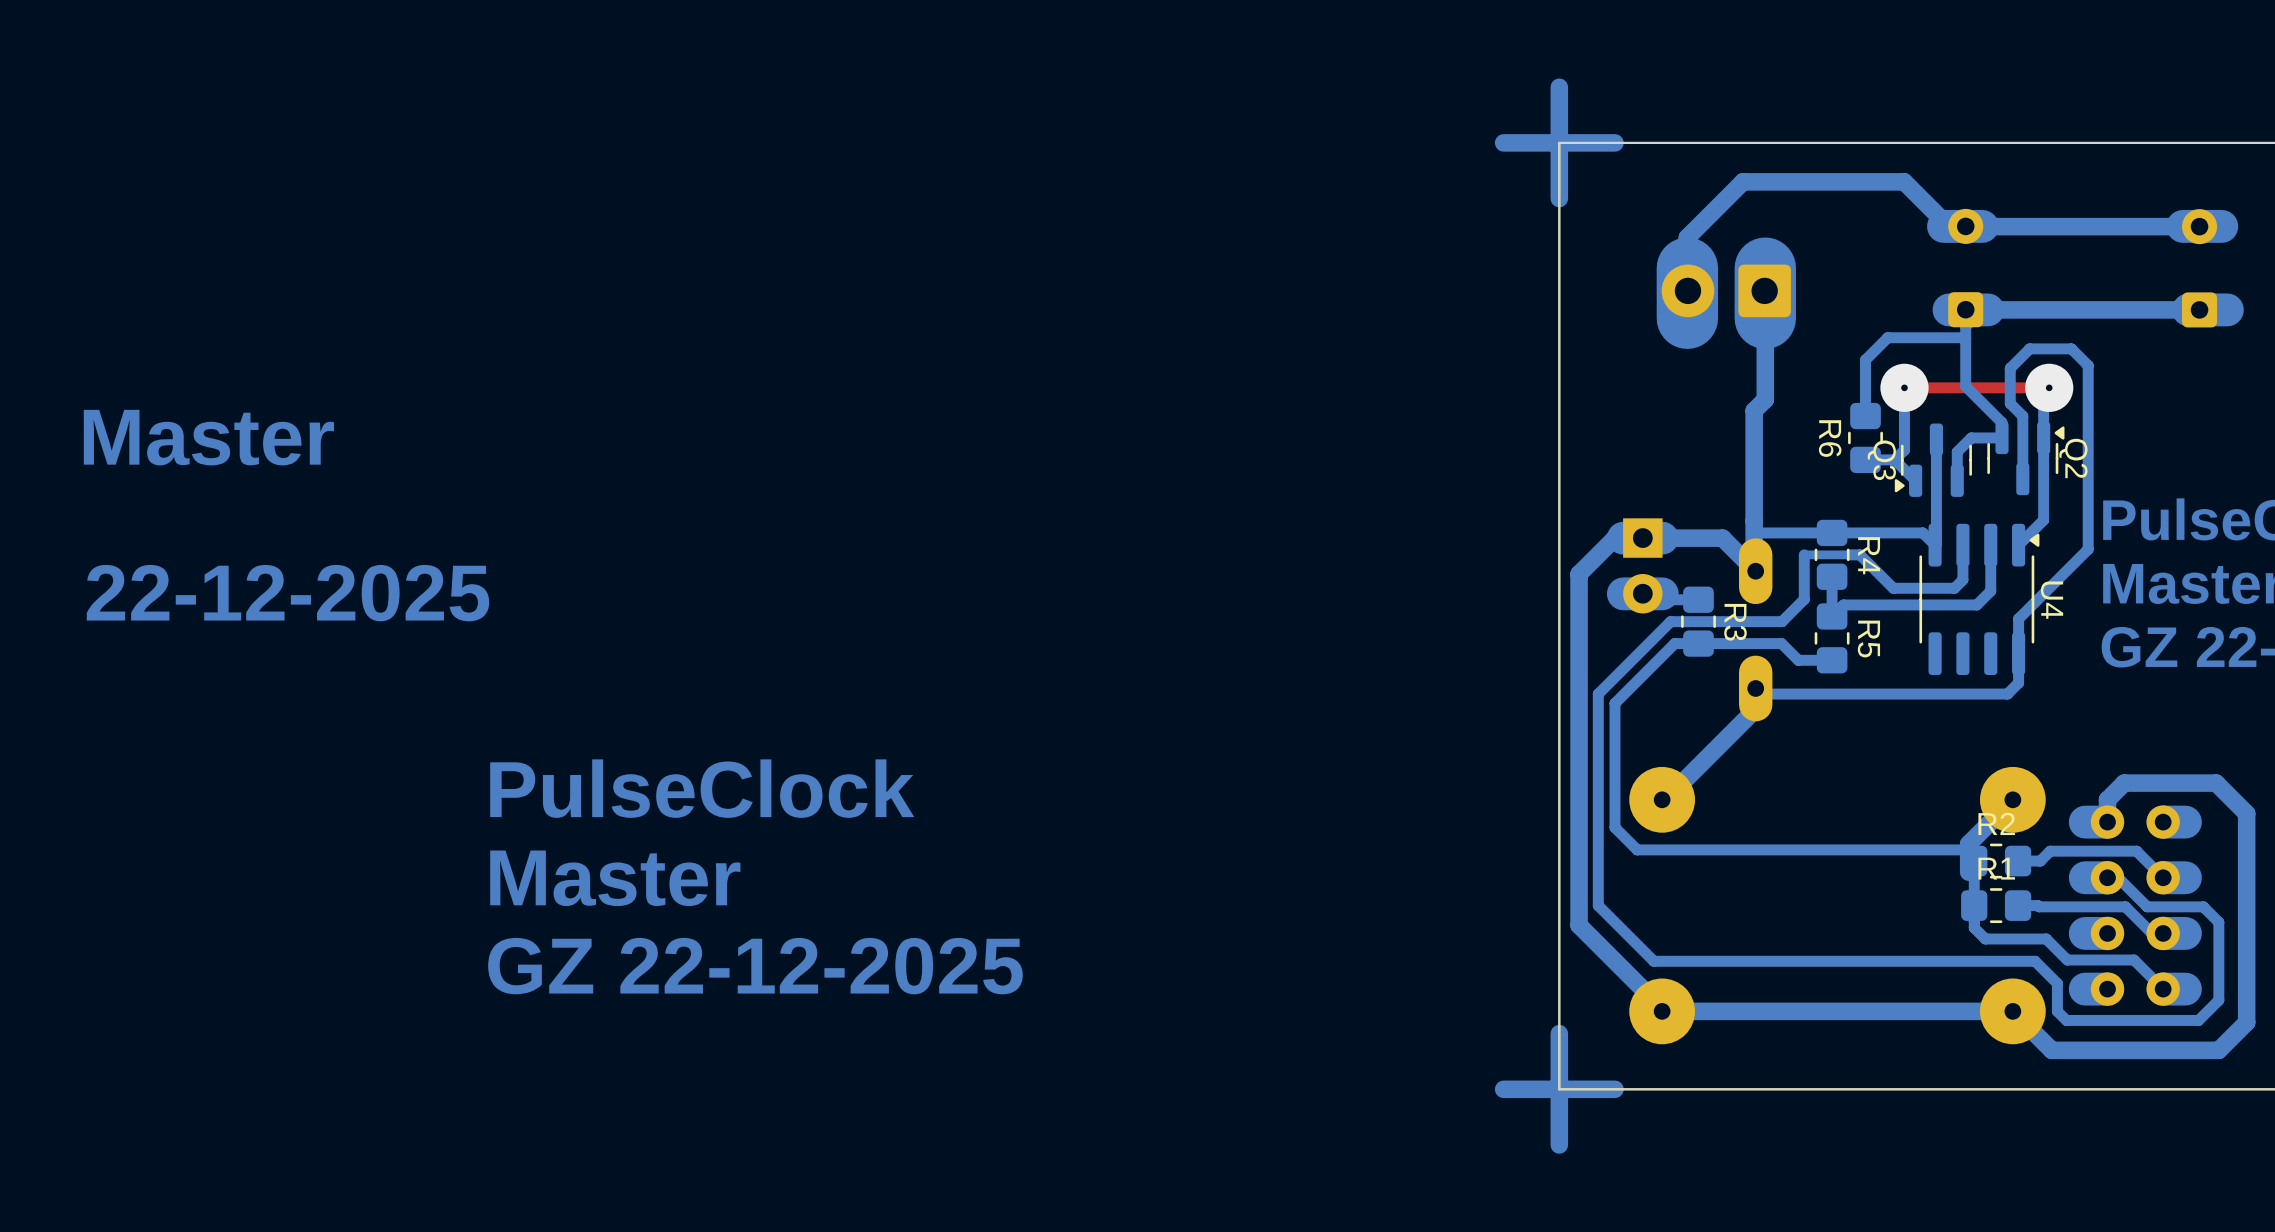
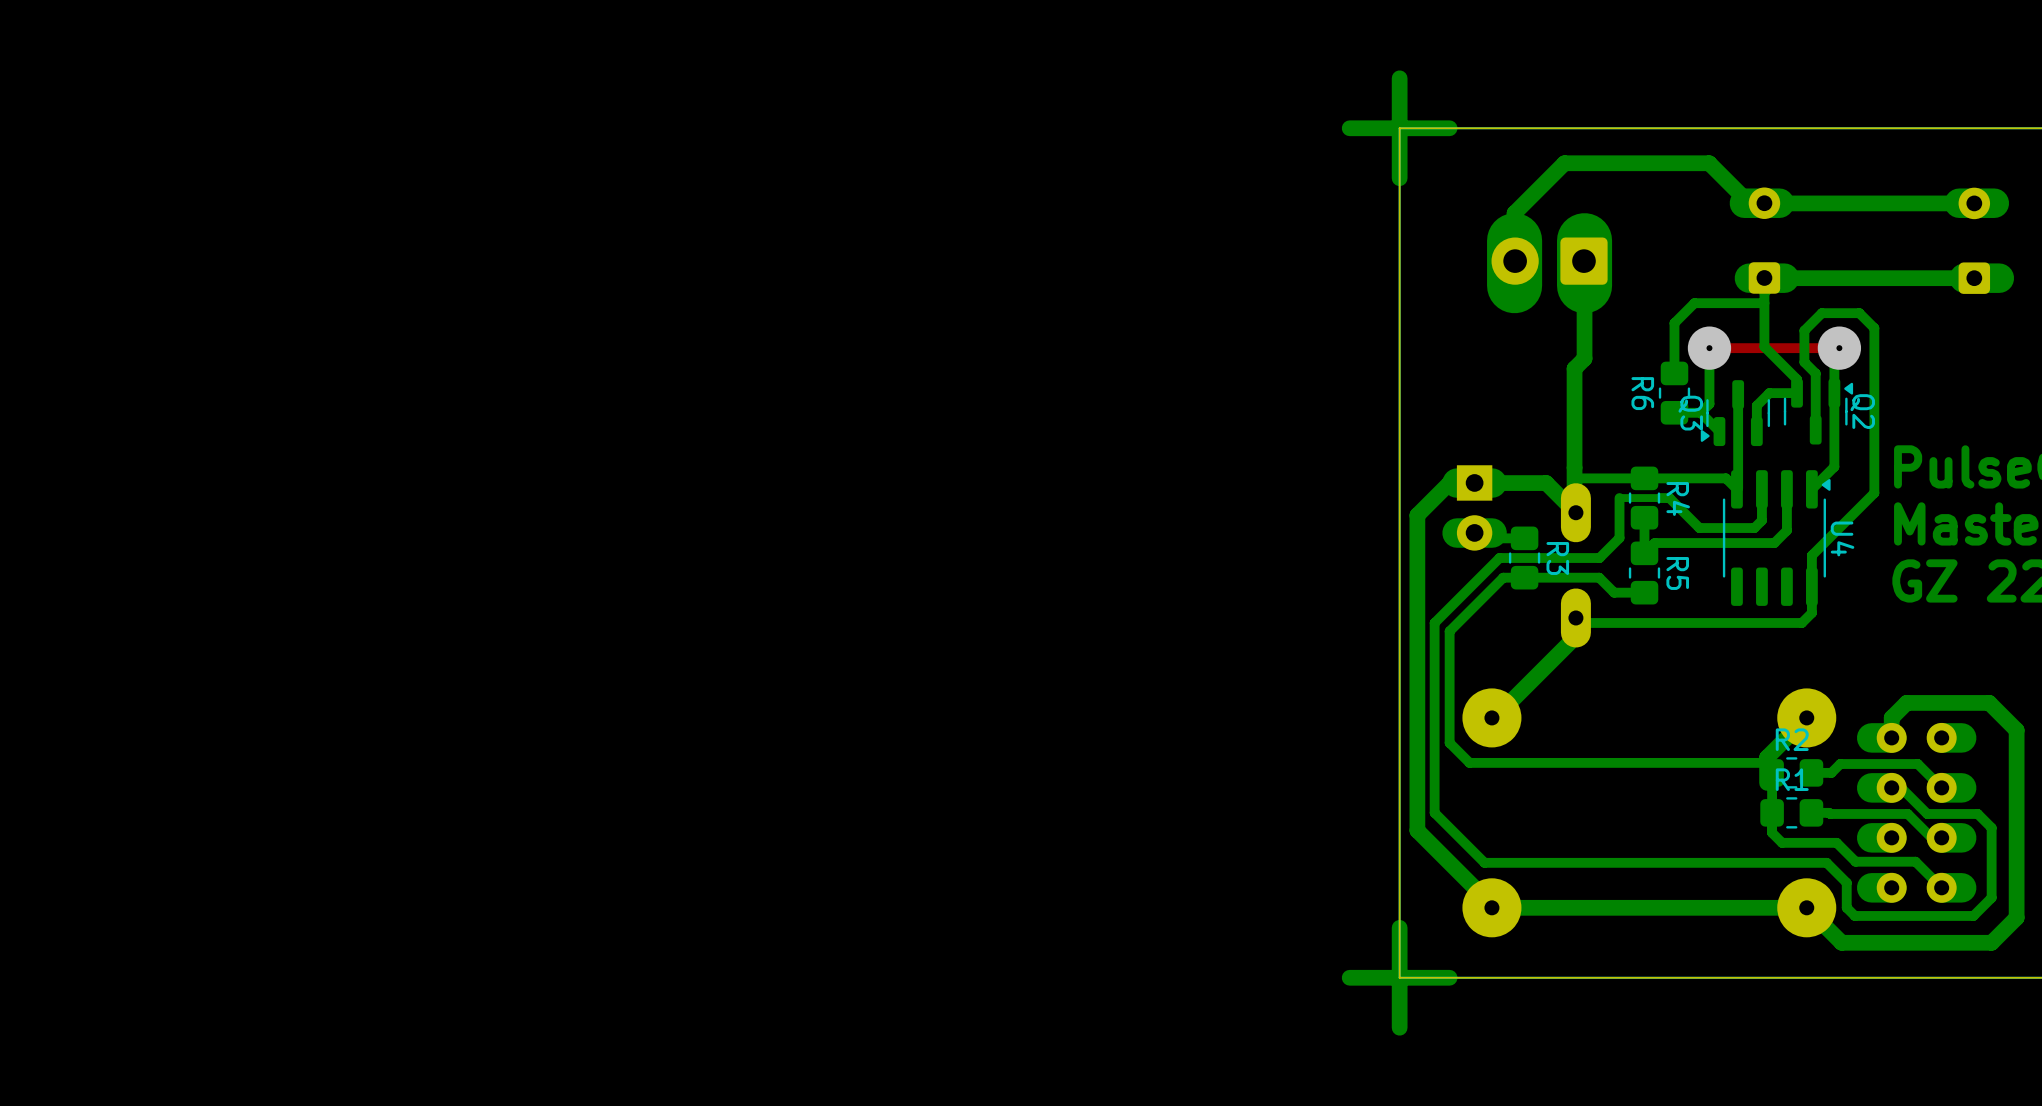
text: Master (208, 437) -> none
text: 22-12-2025 (288, 593) -> none
text: PulseClock (702, 788) -> none
text: Master (615, 878) -> none
text: GZ 22-12-2025 (755, 966) -> none

